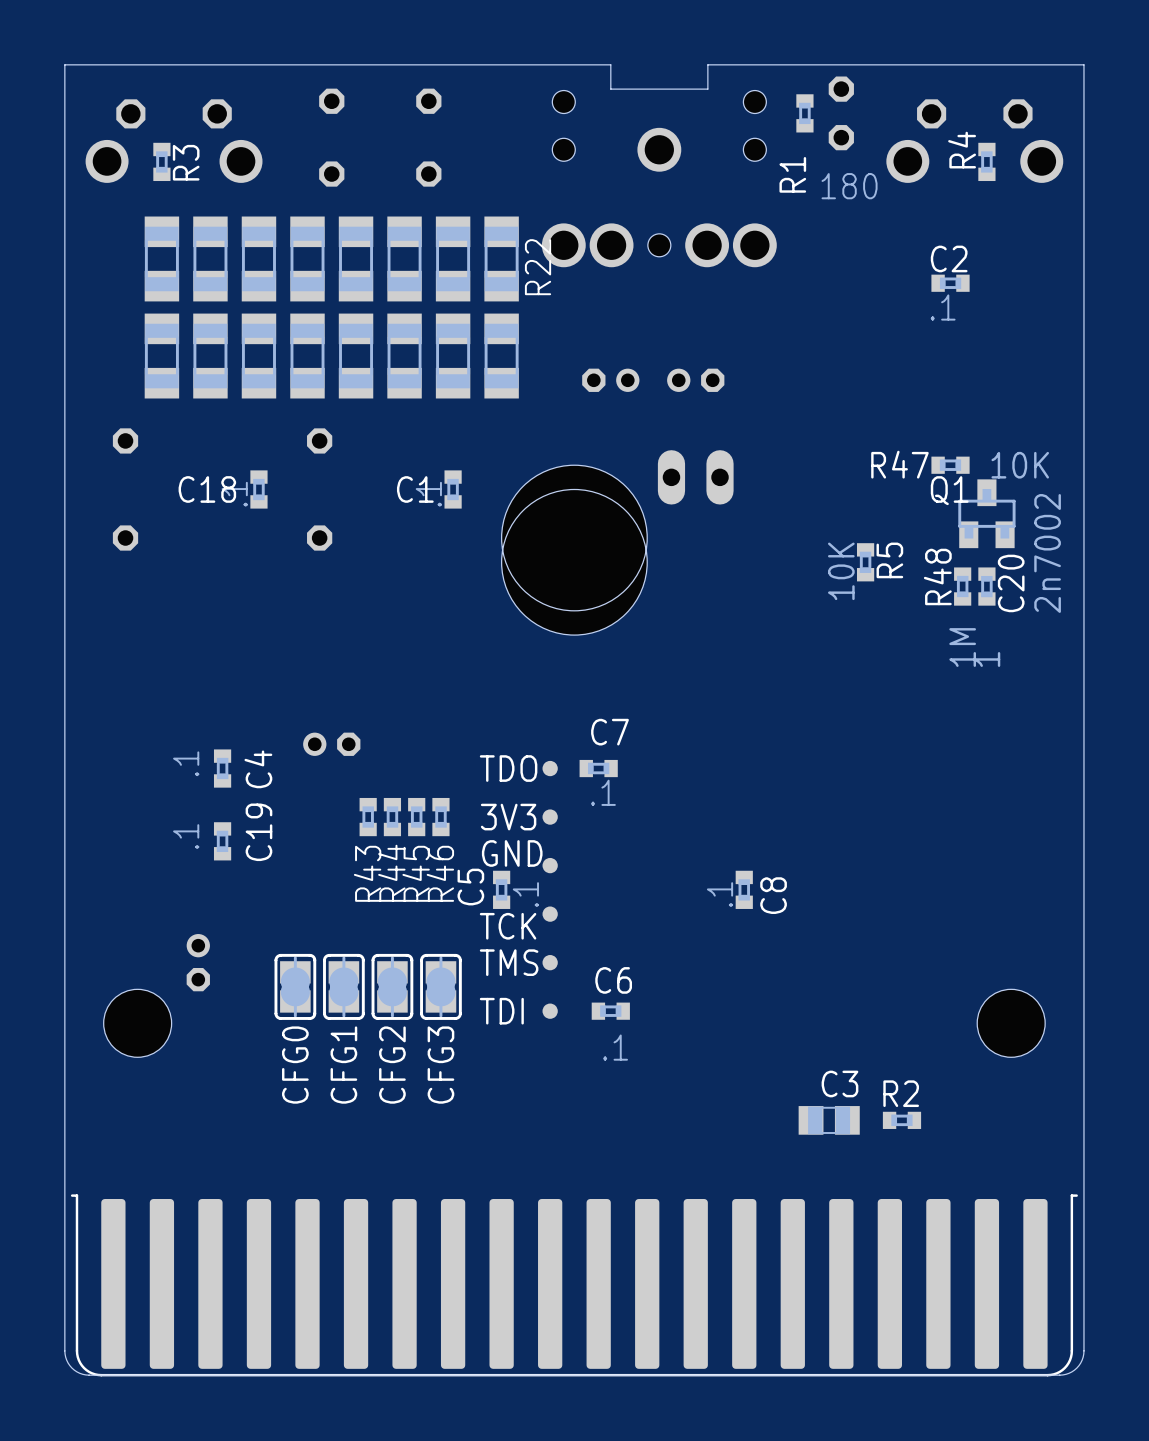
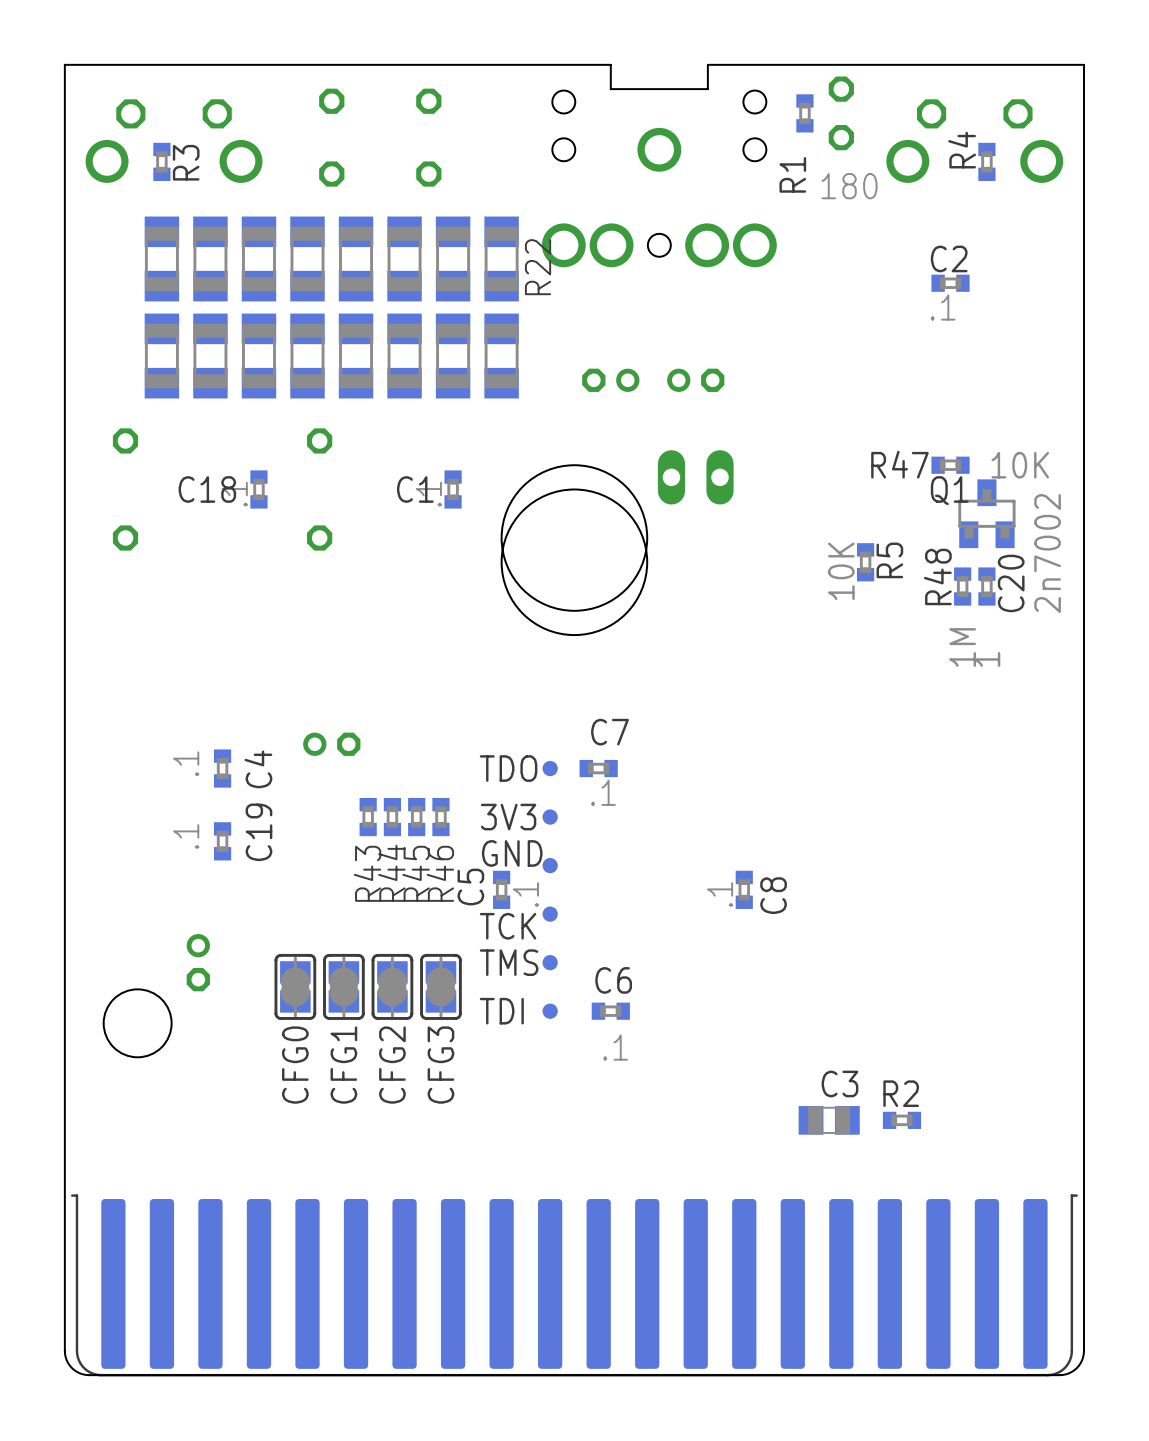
hole: (1011, 1023) -> none

